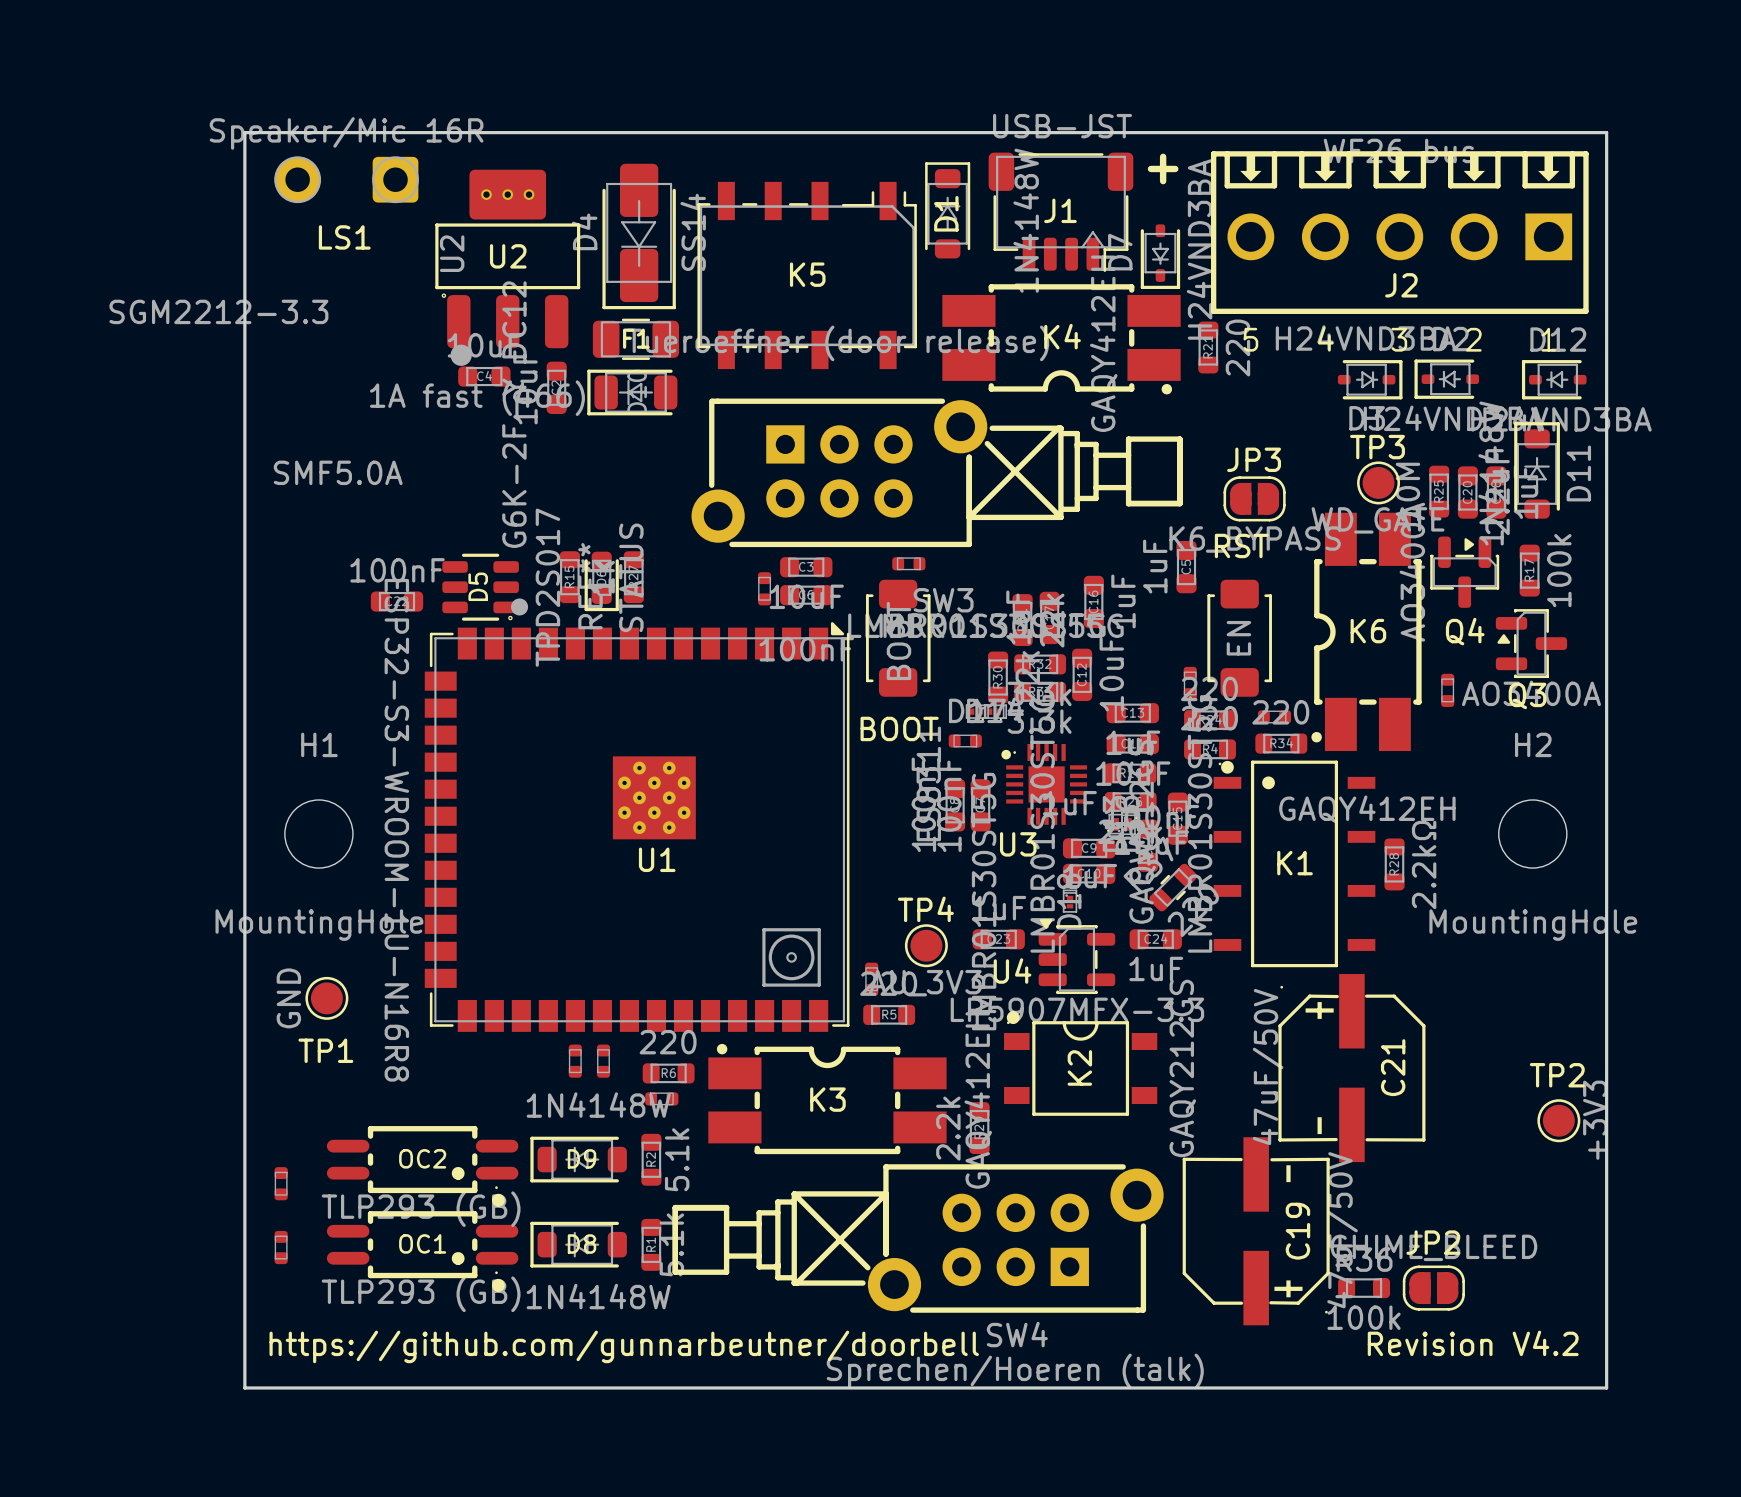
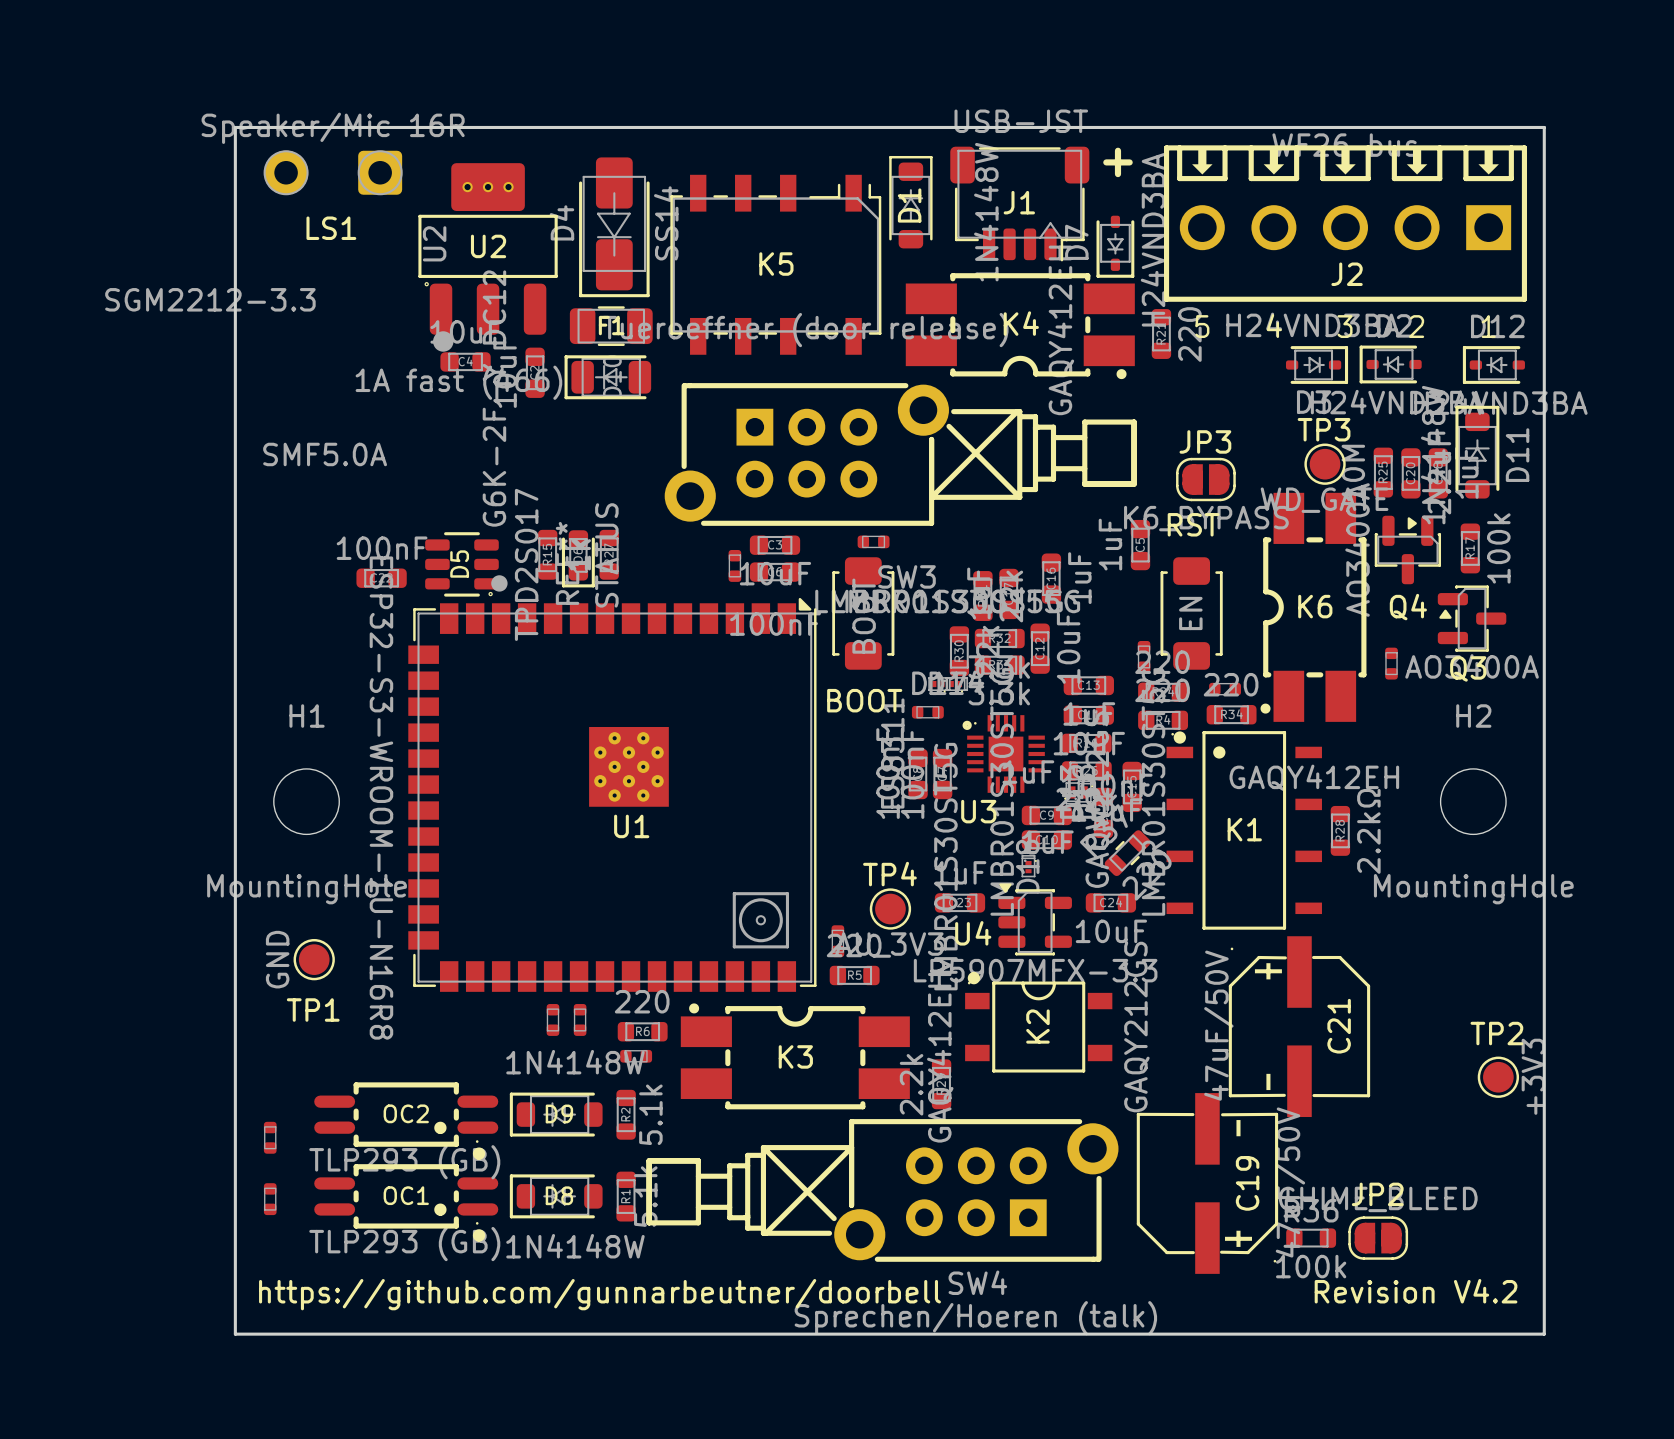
C24 value: 1uF (1156, 968) -> 10uF (1111, 931)

